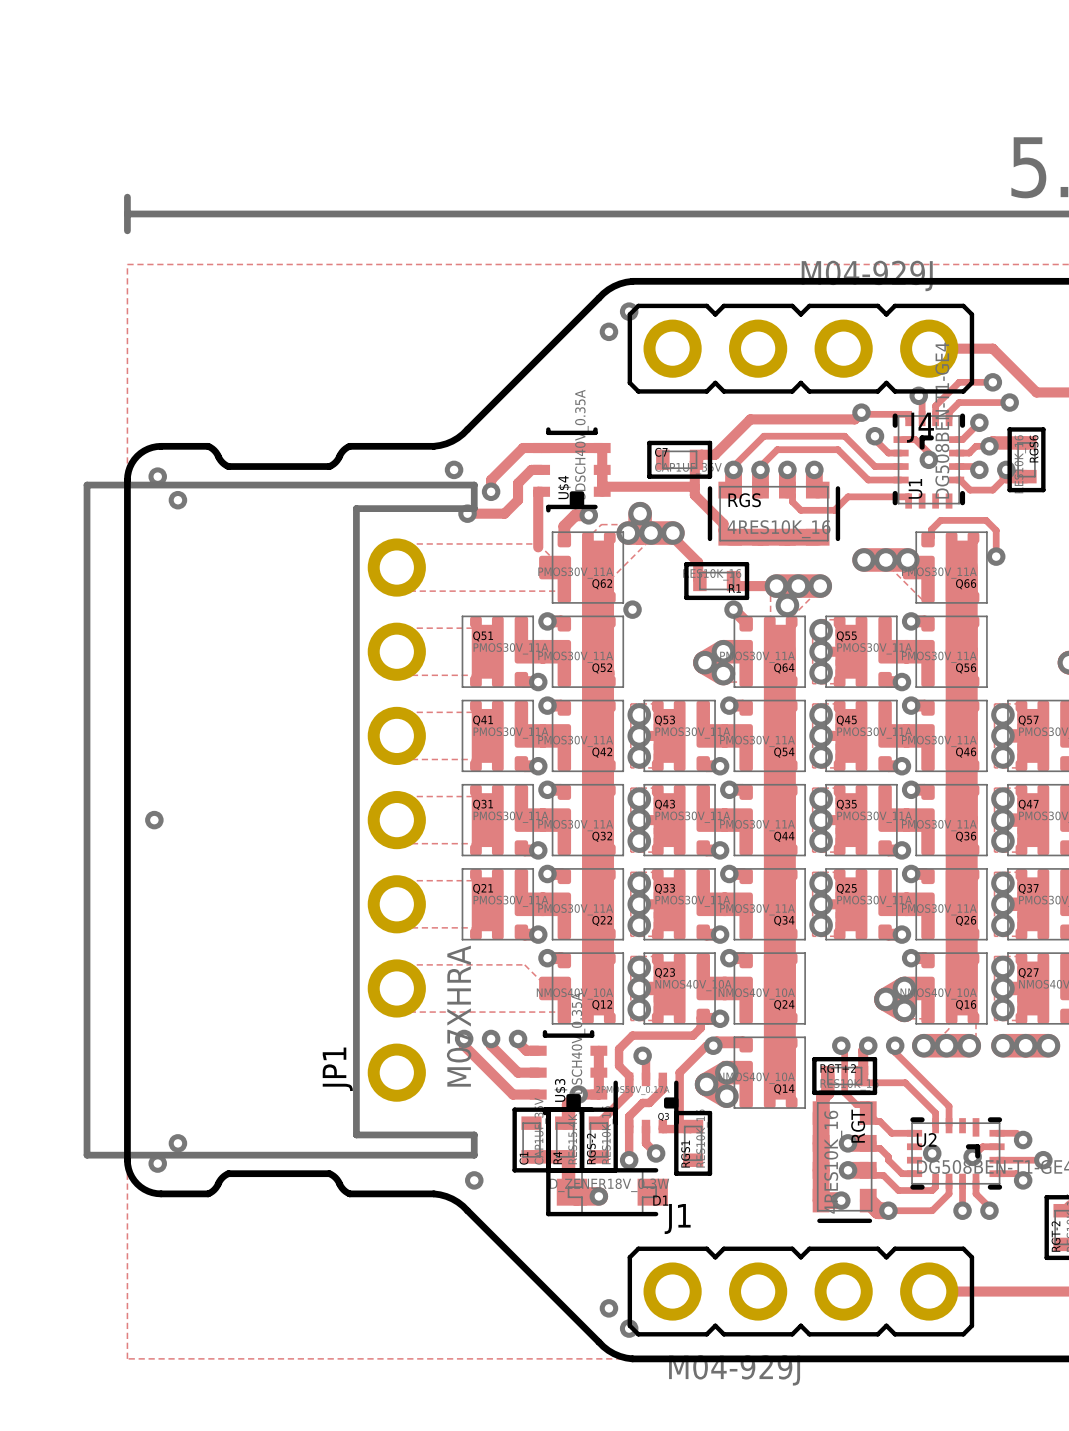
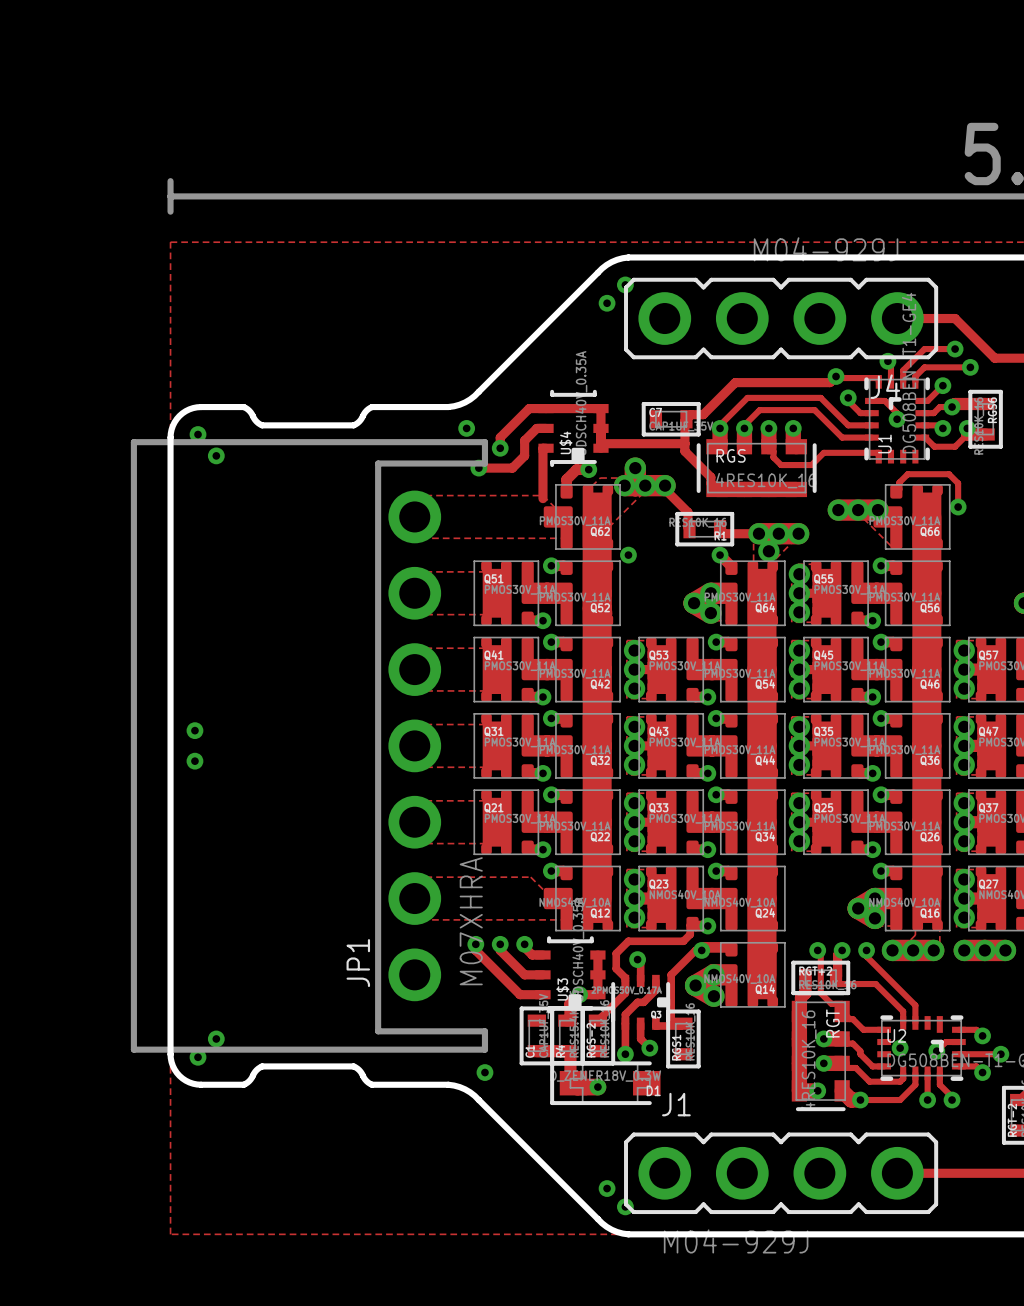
via: none -> (194, 730)
via: (154, 820) -> none
via: none -> (194, 761)

